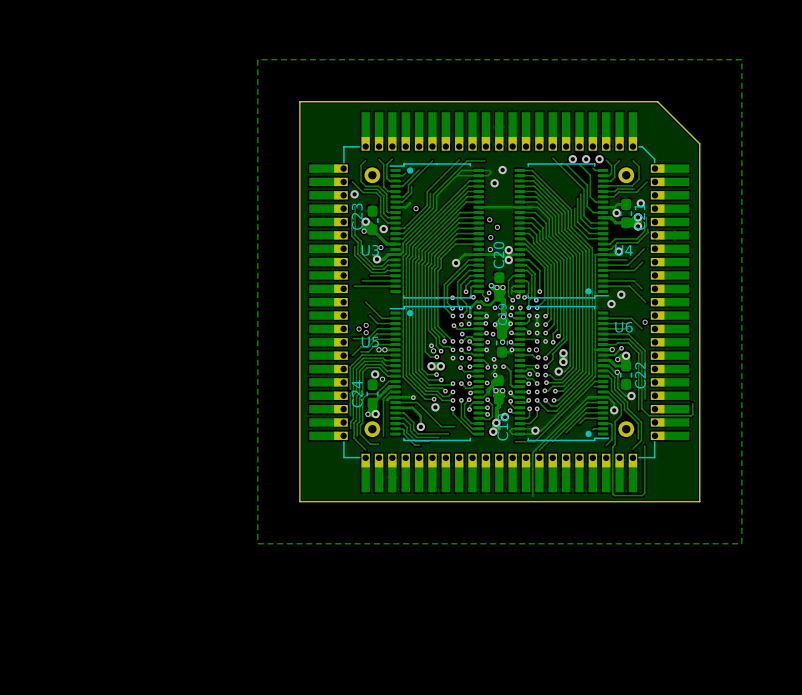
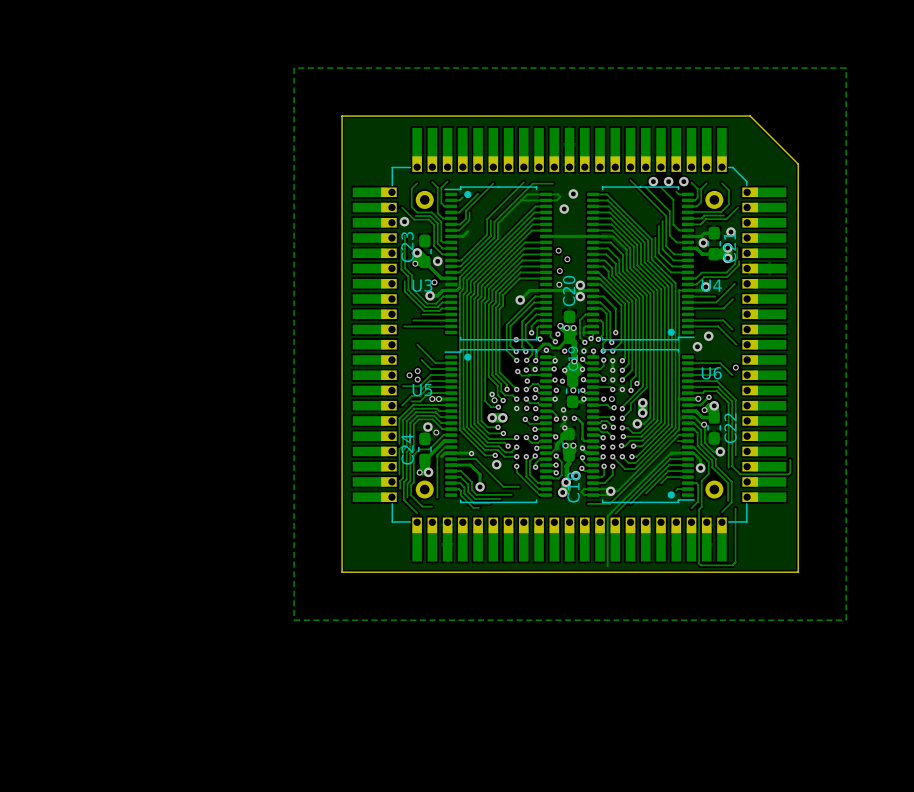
via: (416, 208) -> none

